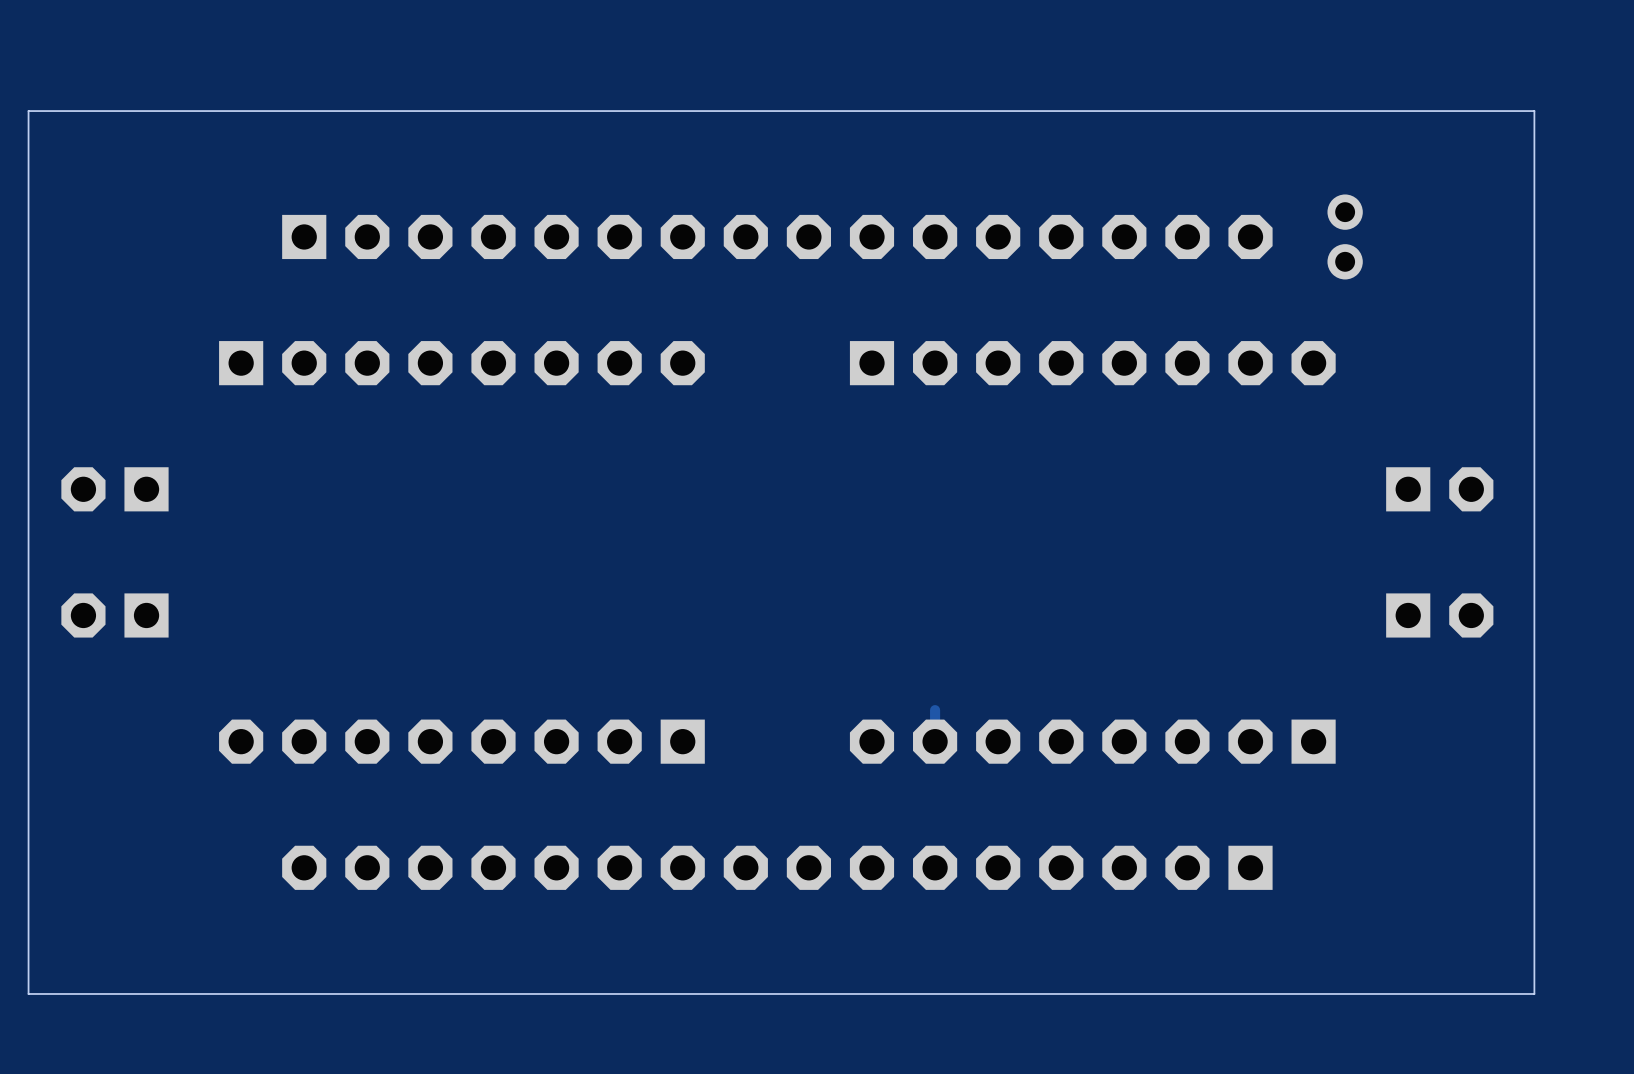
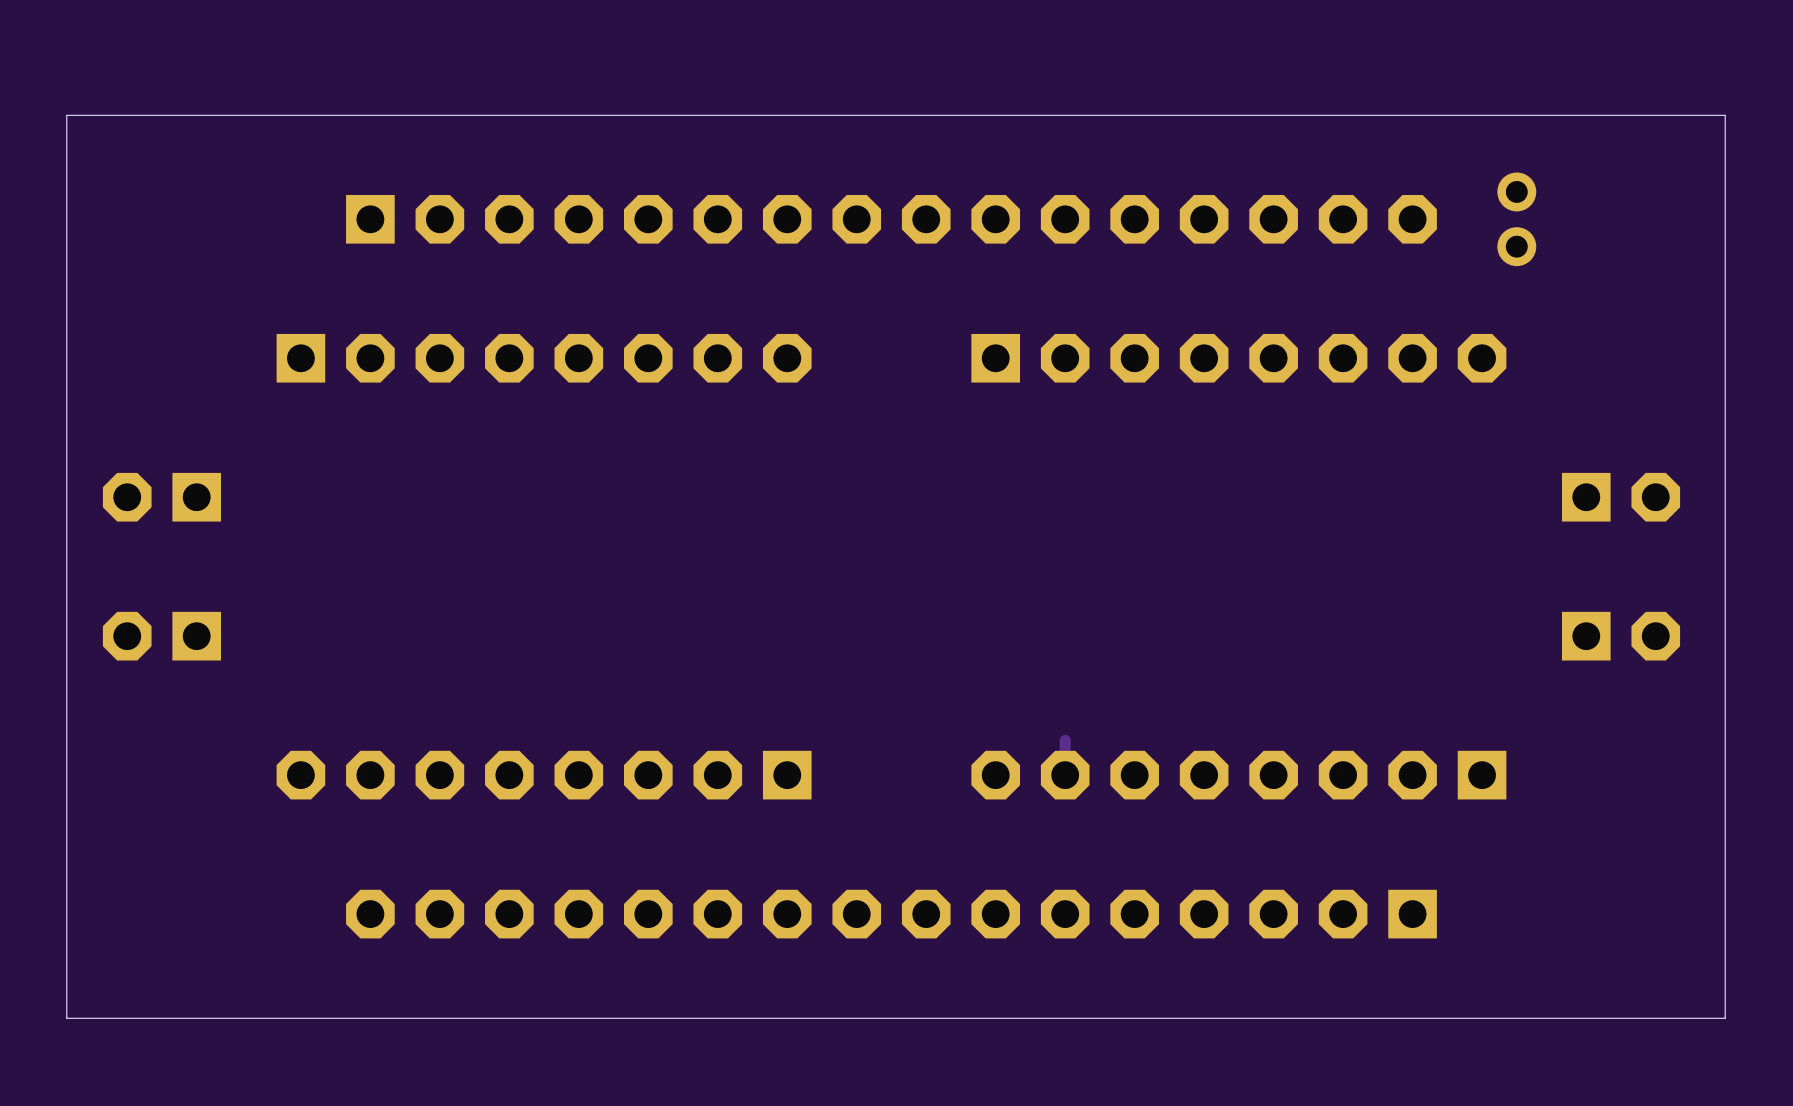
board edge: (1534, 142) (1534, 111) (28, 111) (28, 142) -> (1725, 115) (66, 115)
board edge: (1534, 962) (1534, 993) (28, 993) (28, 962) -> (1725, 1018) (66, 1018)

